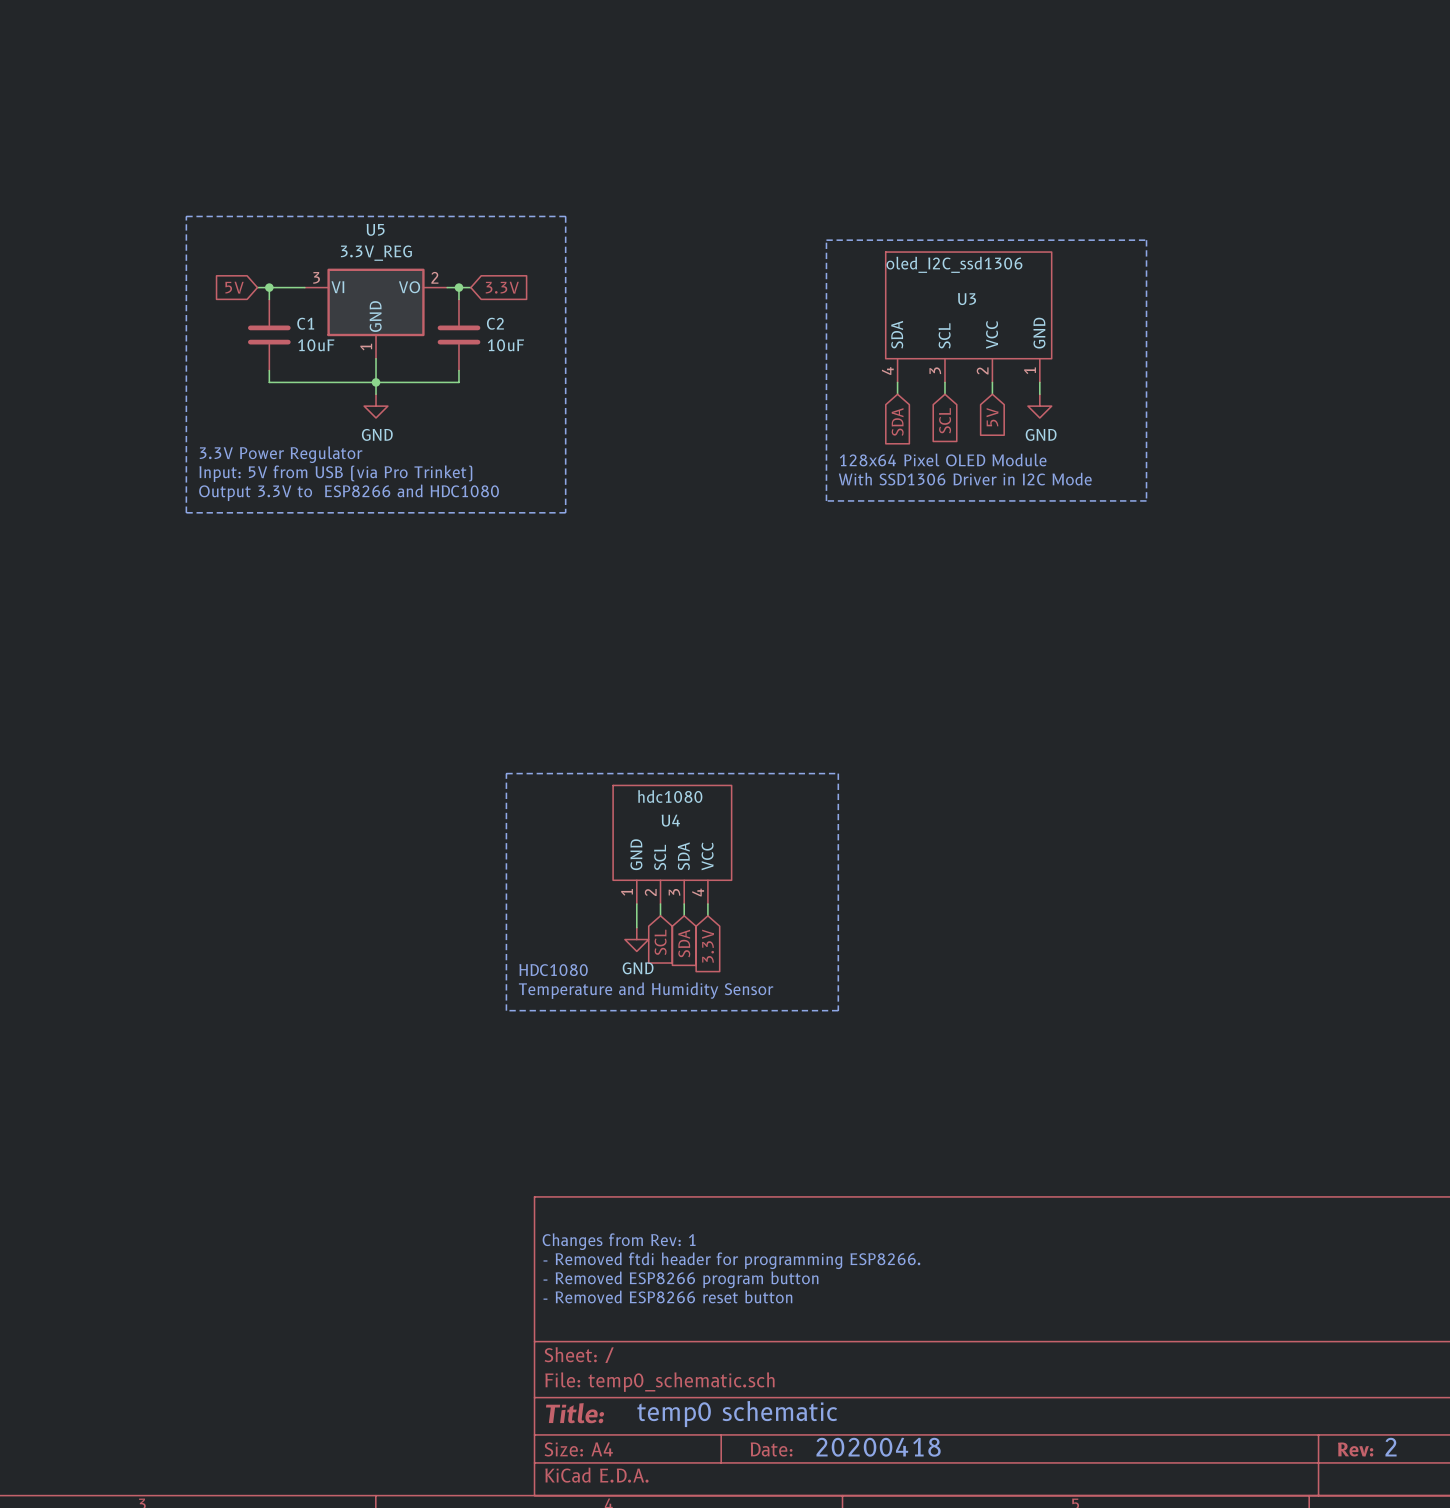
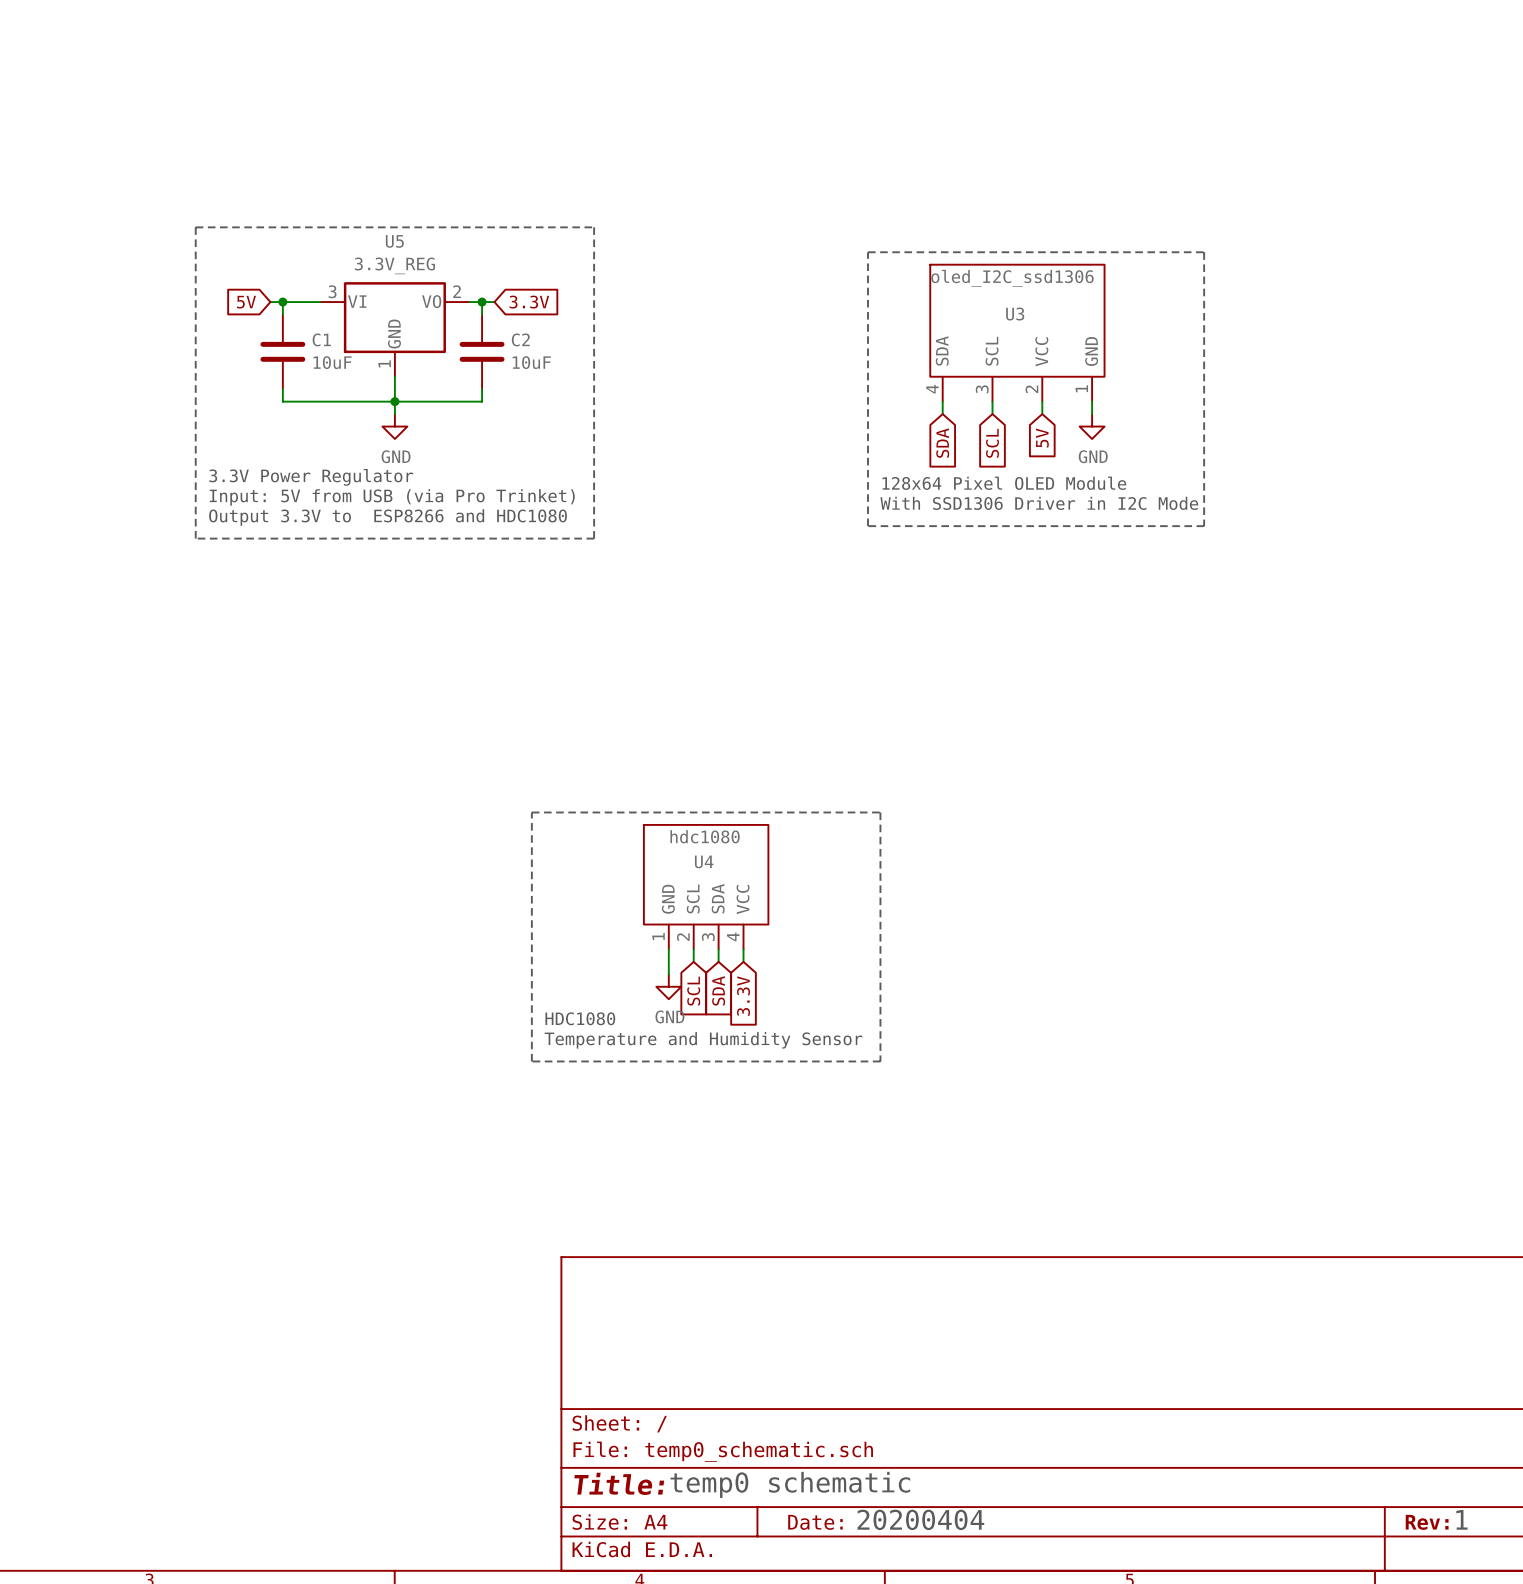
text: Changes from Rev: 1 (619, 1241) -> none
text: - Removed ftdi header for programming ESP8266. (731, 1260) -> none
text: - Removed ESP8266 program button (680, 1279) -> none
text: - Removed ESP8266 reset button (667, 1296) -> none
text: 20200418 (878, 1447) -> 20200404 (920, 1519)
text: 2 (1391, 1447) -> 1 (1461, 1519)

